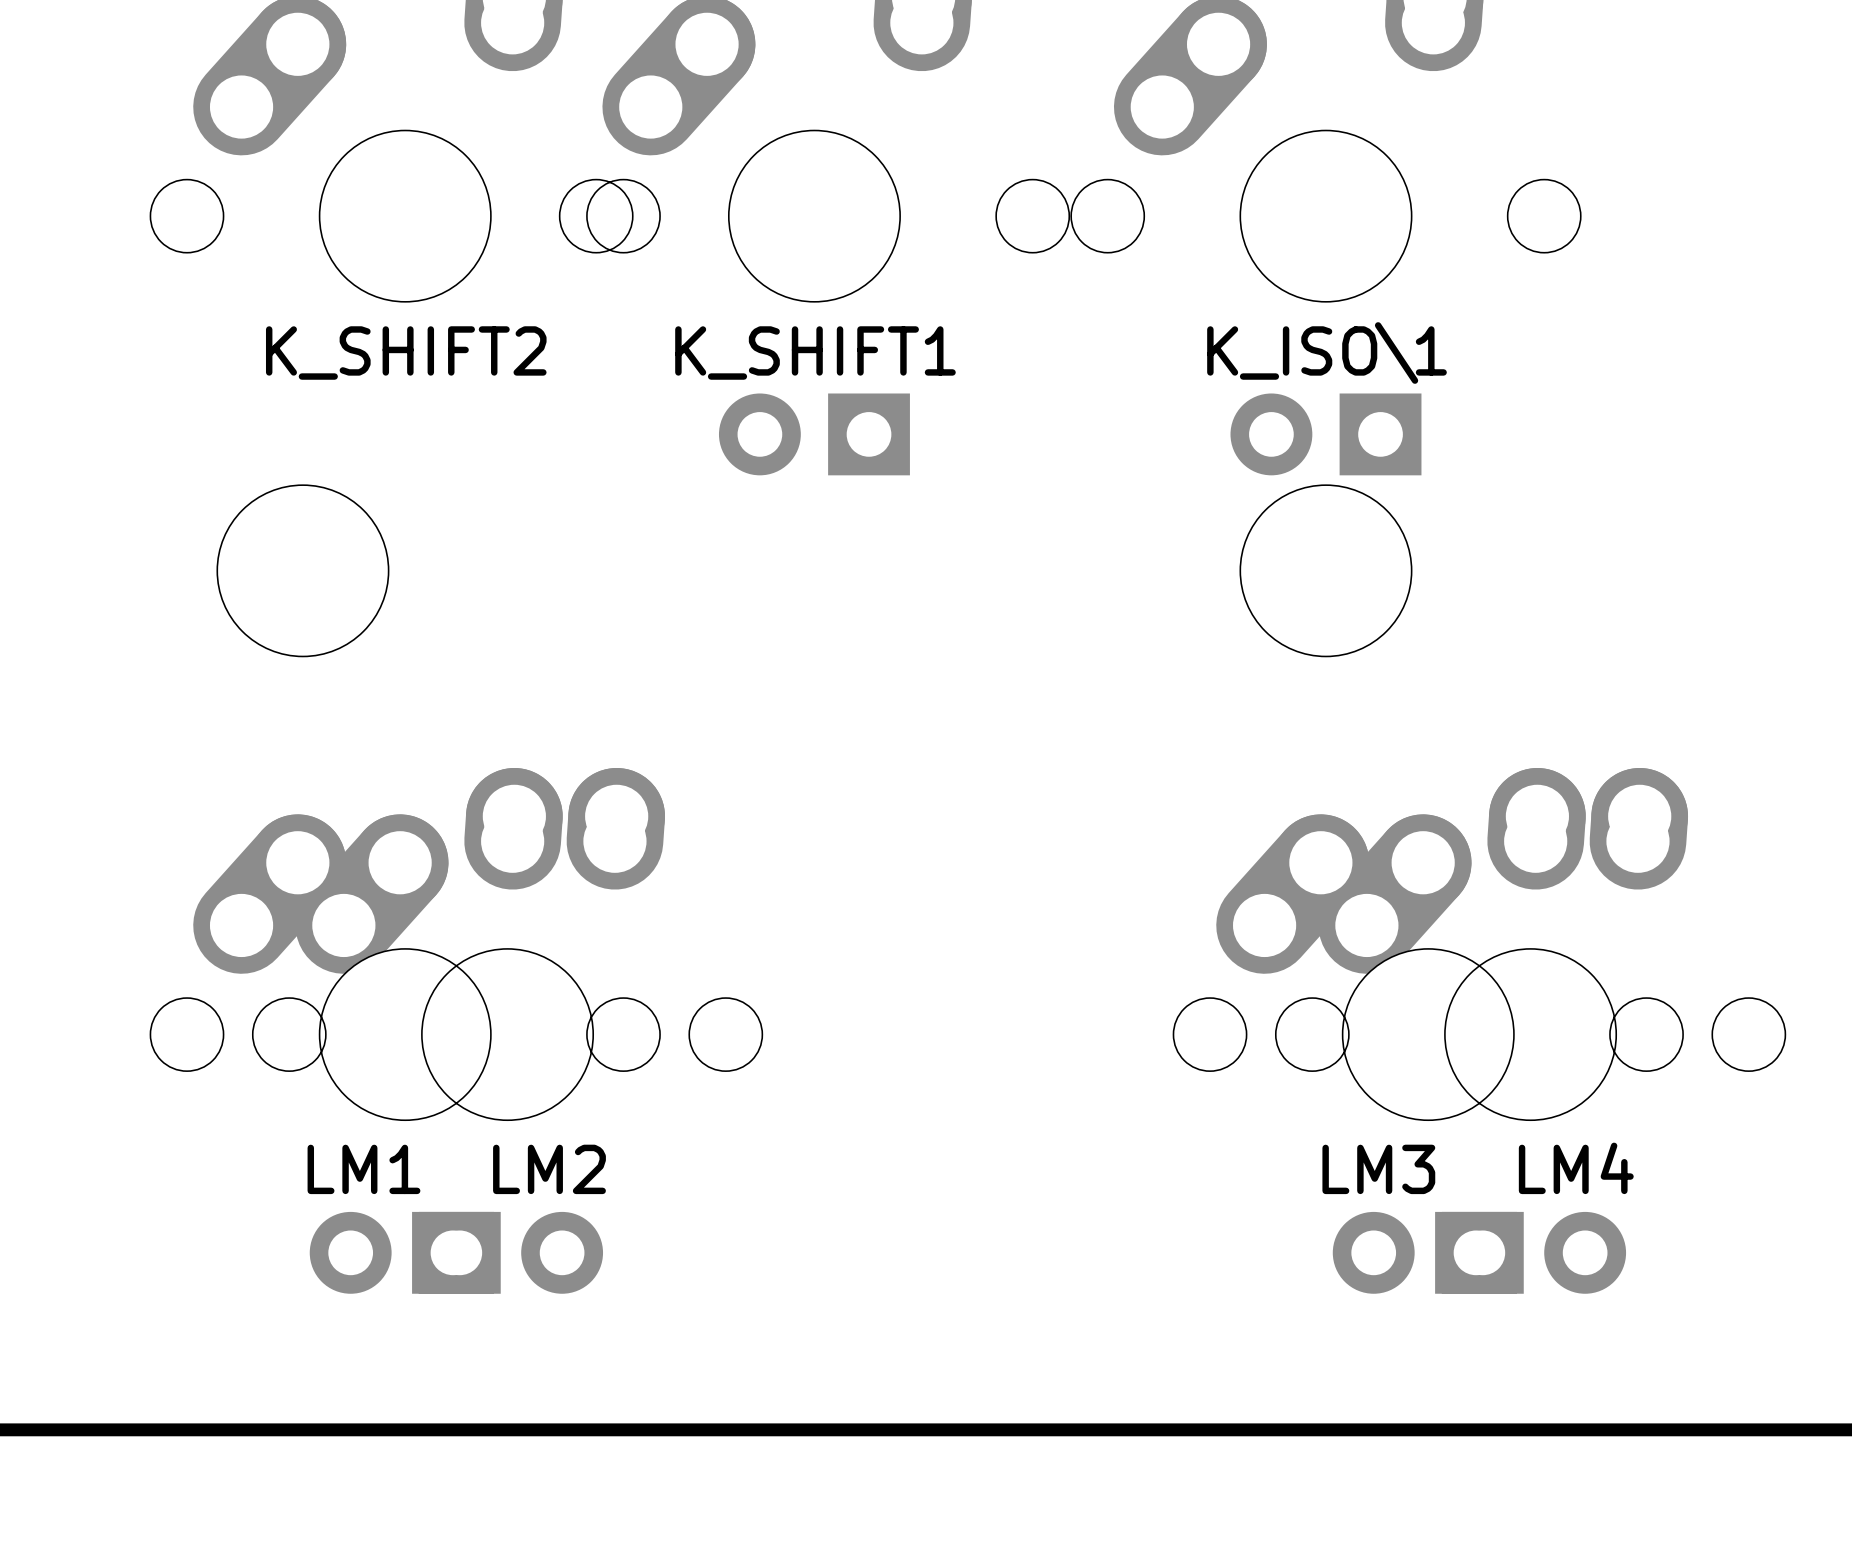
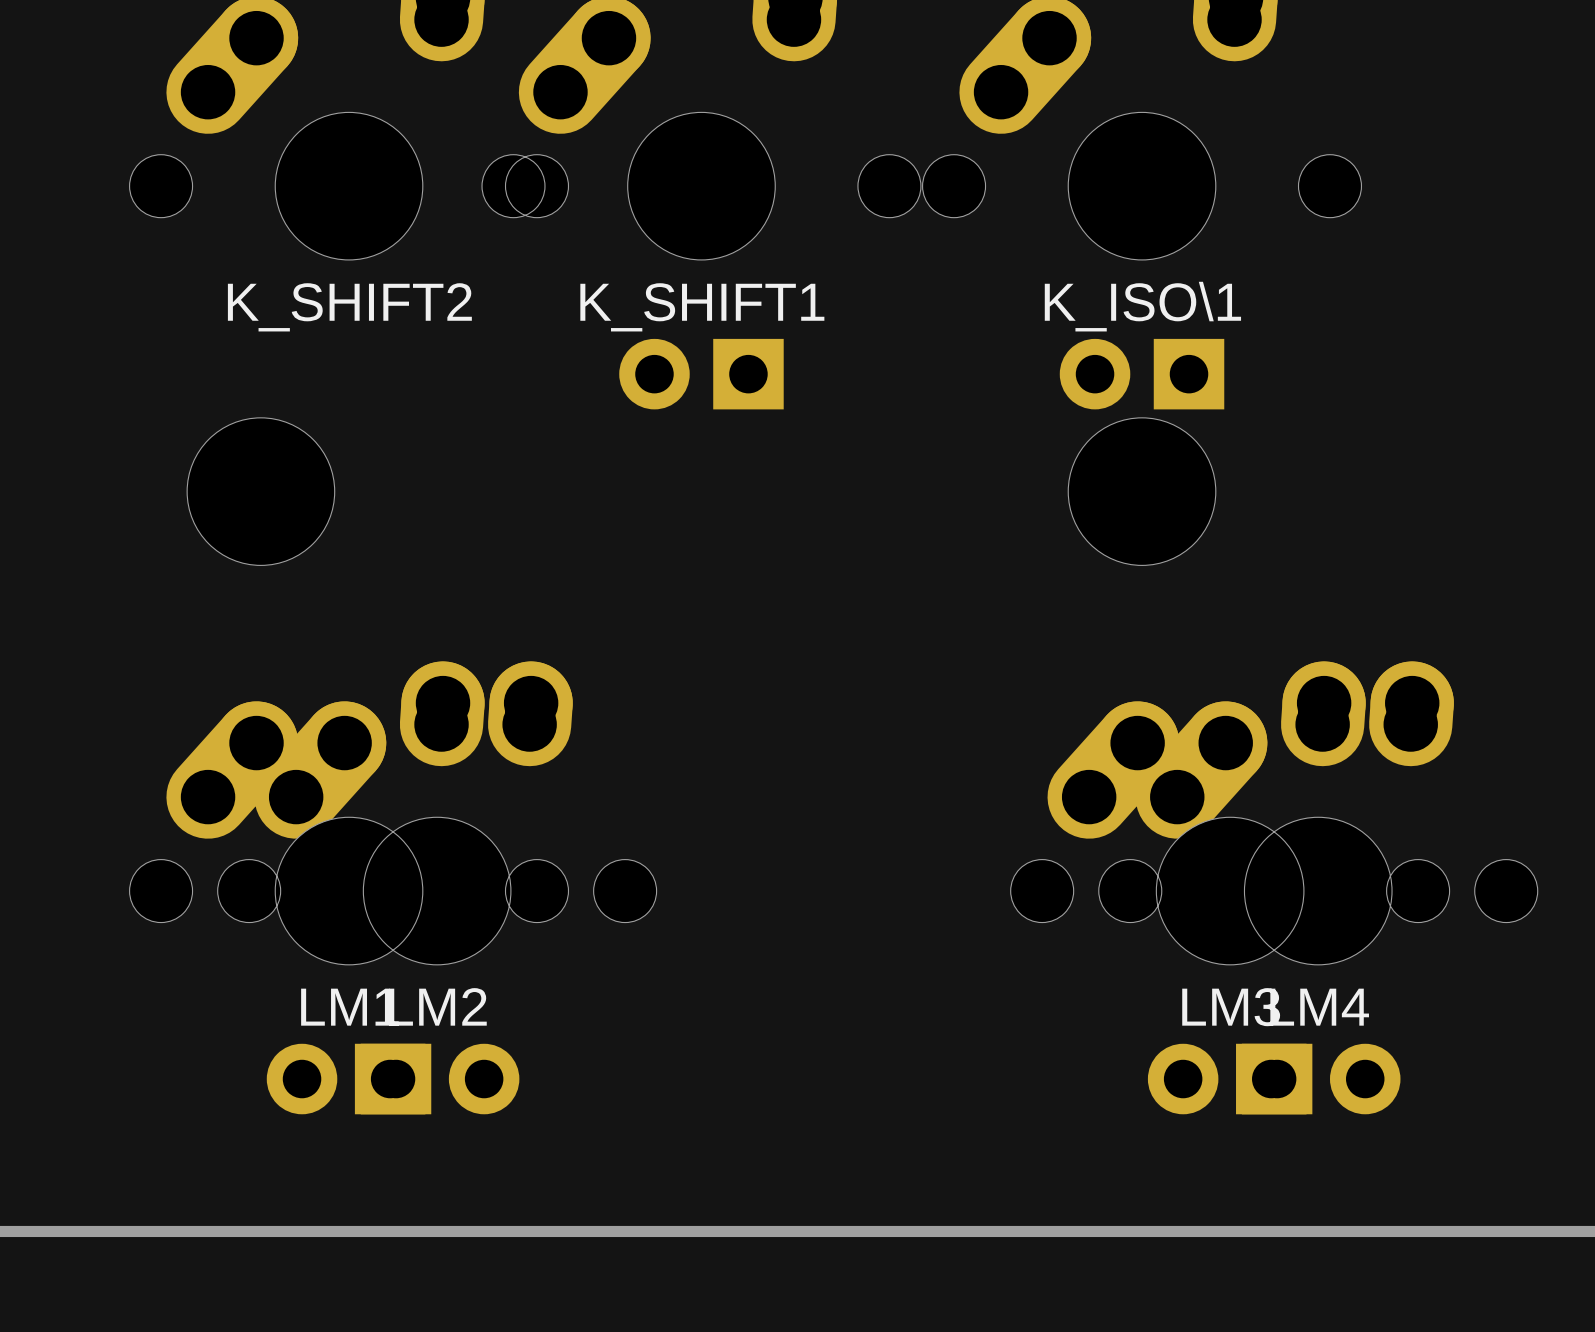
LM4 name position: LM4 (1576, 1168) -> LM4 (1319, 1007)
LM1 name position: LM1 (363, 1169) -> LM1 (349, 1007)
LM2 name position: LM2 (549, 1169) -> LM2 (437, 1006)
LM3 name position: LM3 (1378, 1169) -> LM3 (1231, 1007)

